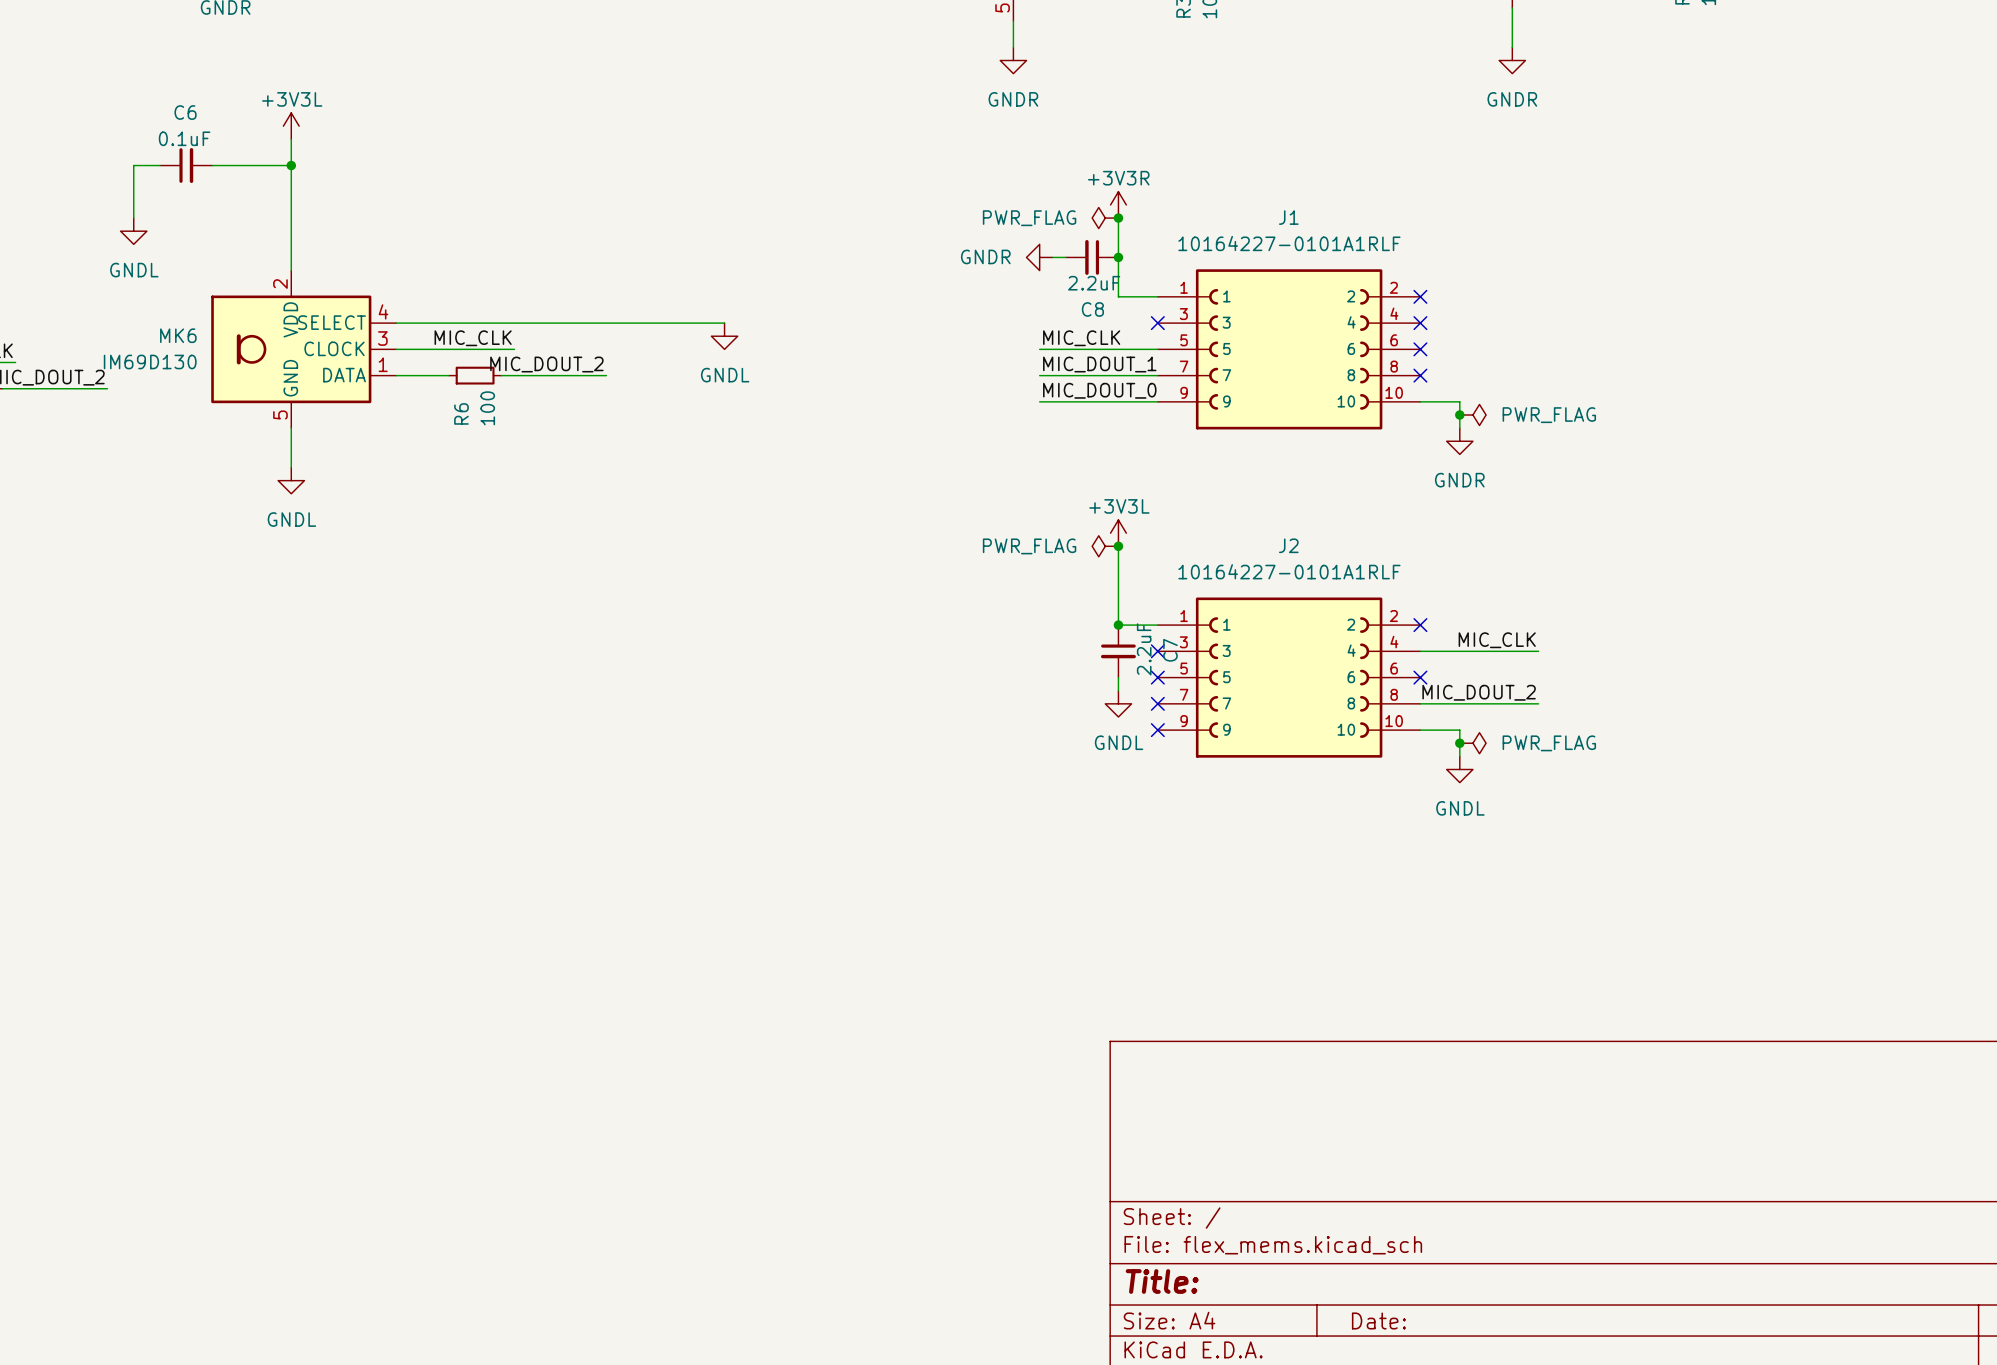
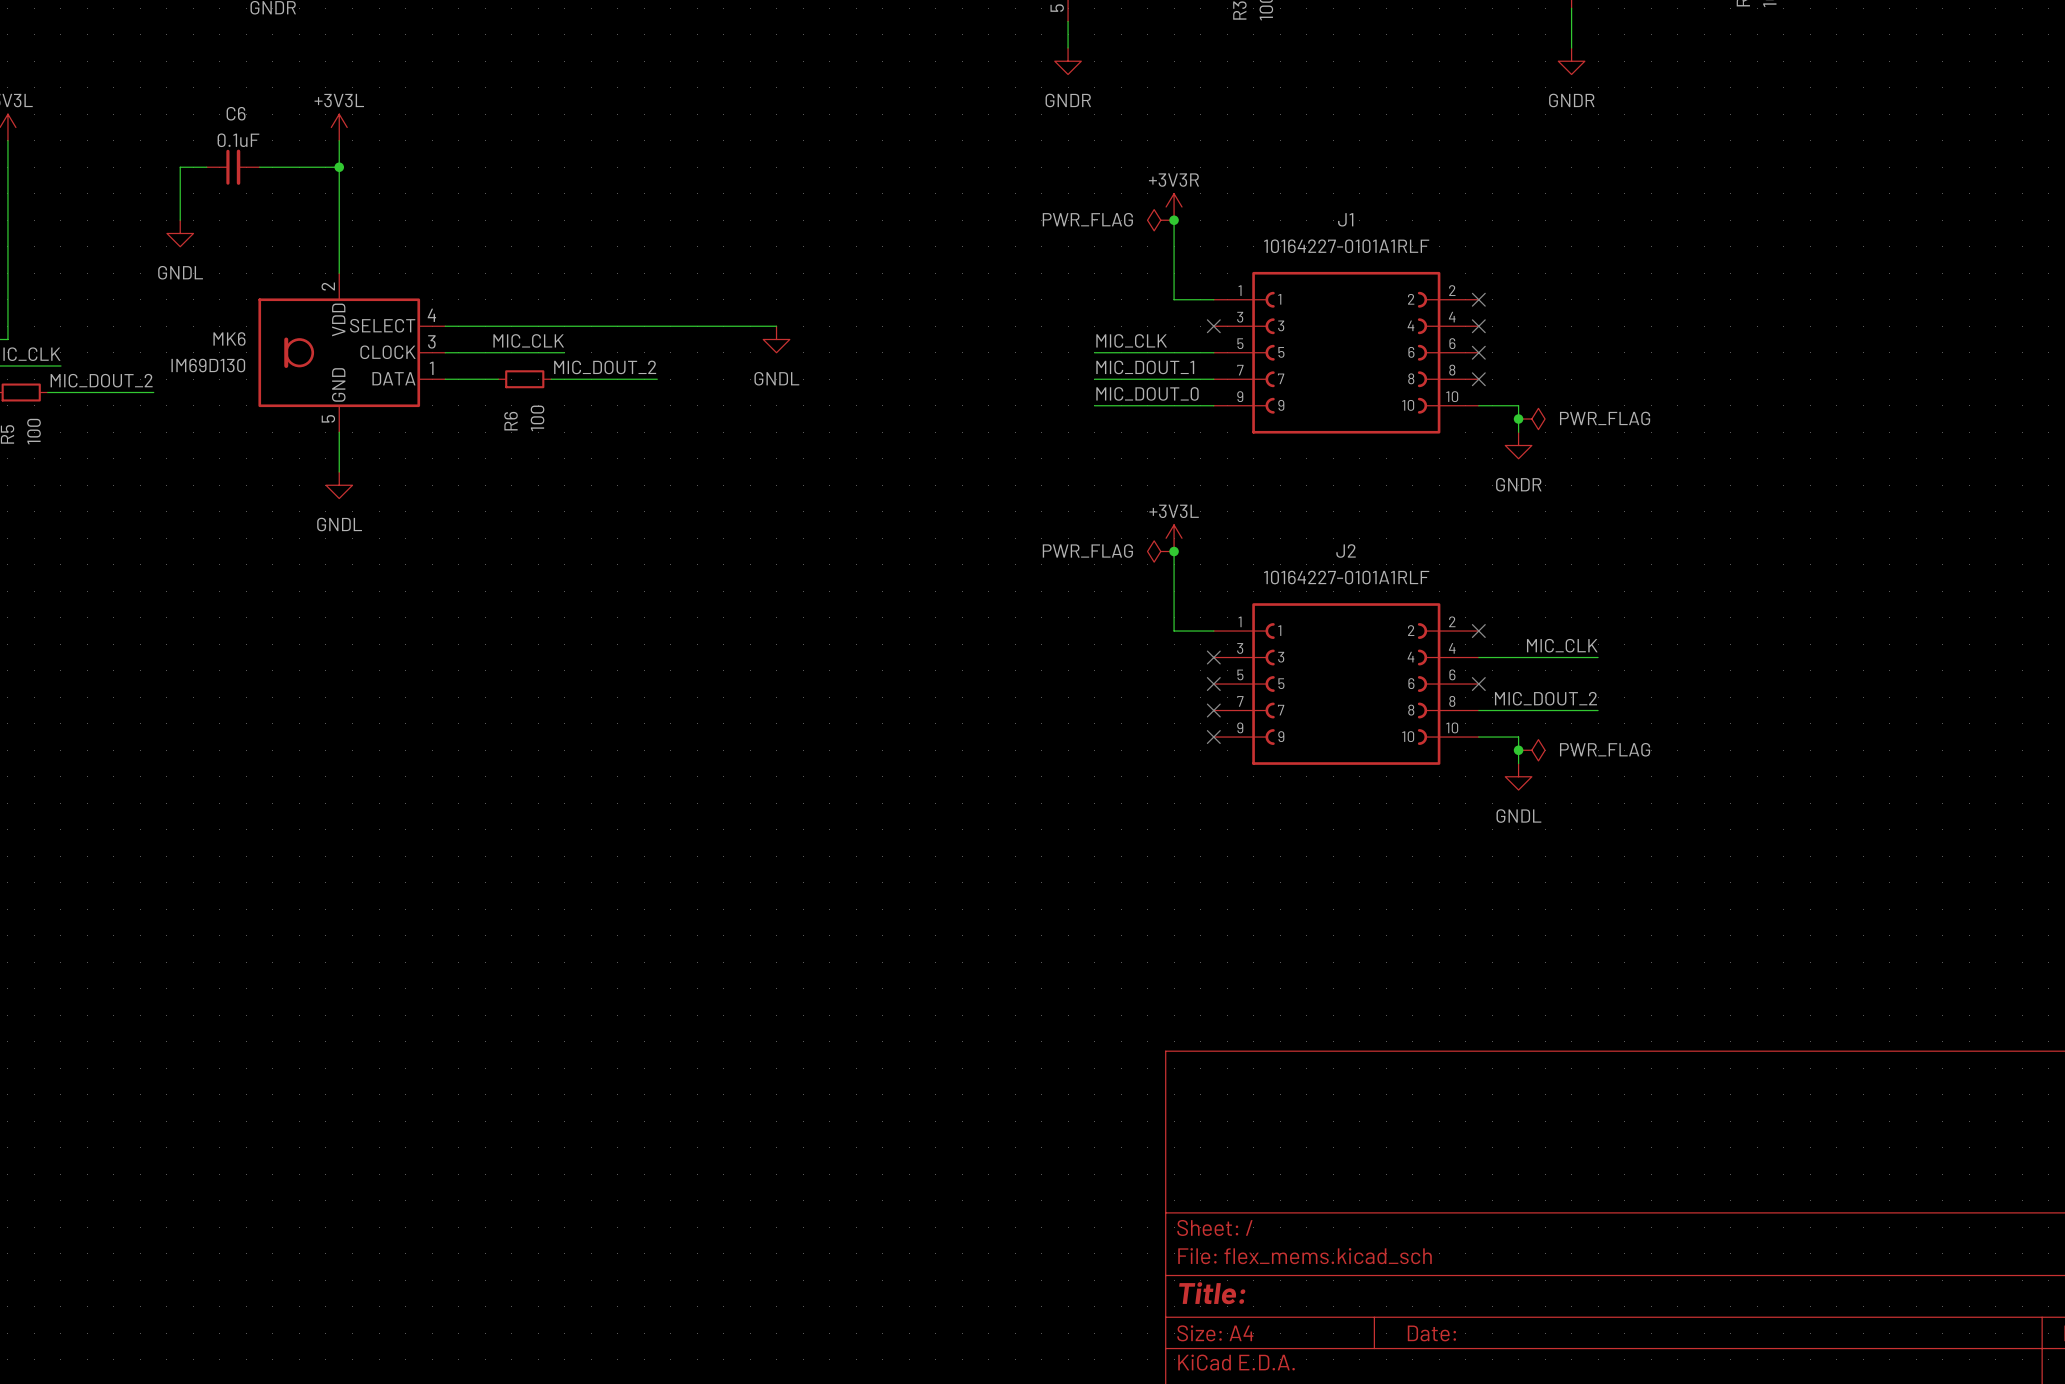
power symbol: GNDR (1039, 257) -> none
wire: (1052, 257) (1065, 257) -> none
C8: 2.2uF (1092, 257) -> none
junction: (1118, 257) -> none
junction: (1118, 625) -> none
C7: 2.2uF (1118, 651) -> none
wire: (1118, 677) (1118, 690) -> none
power symbol: GNDL (1118, 703) -> none

